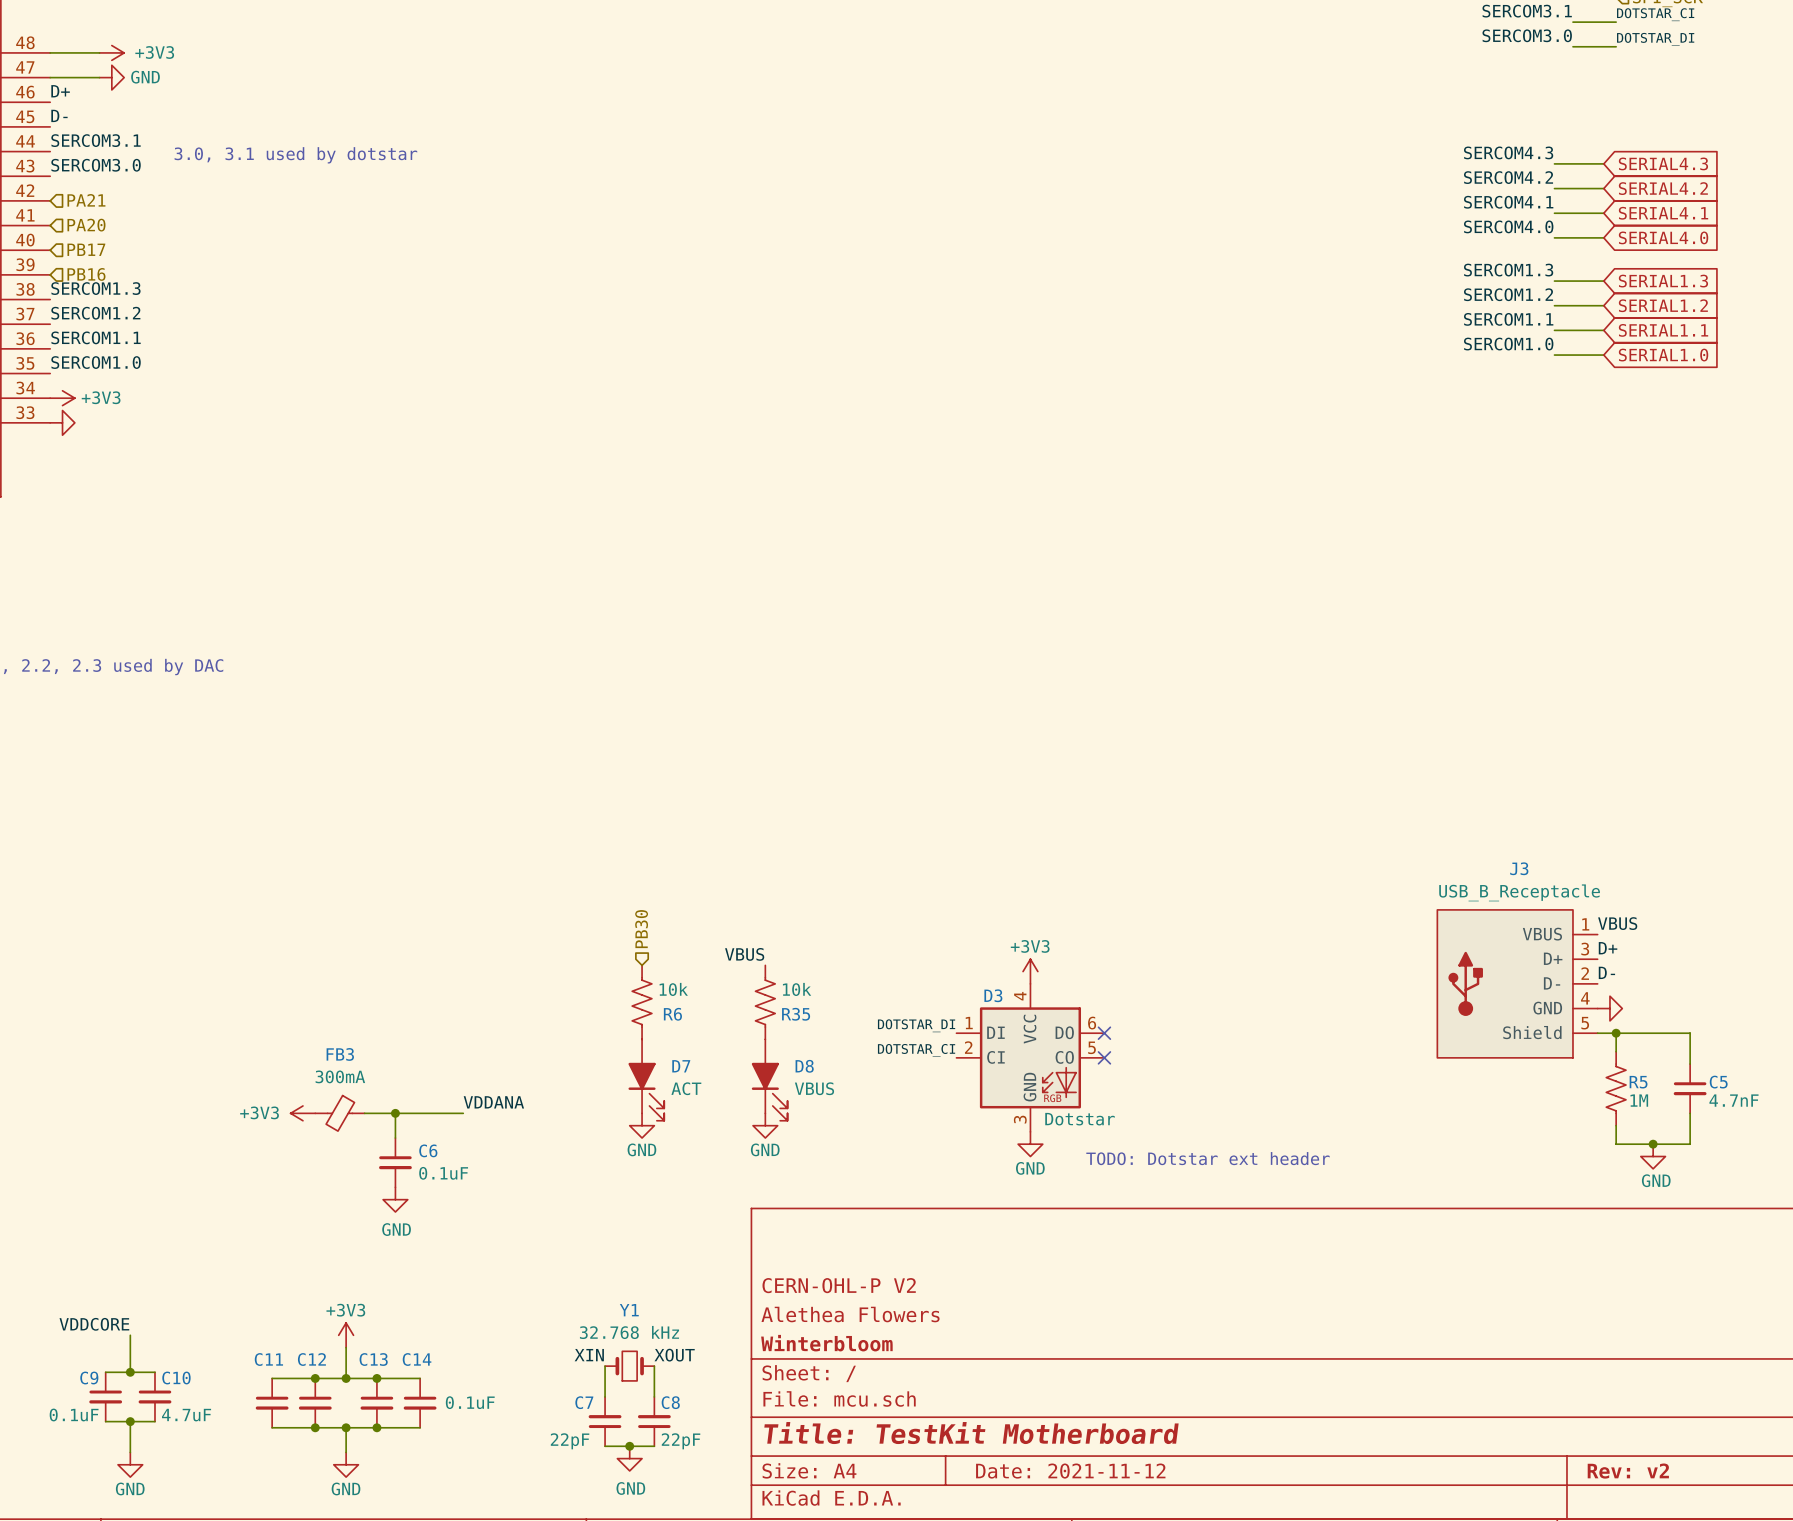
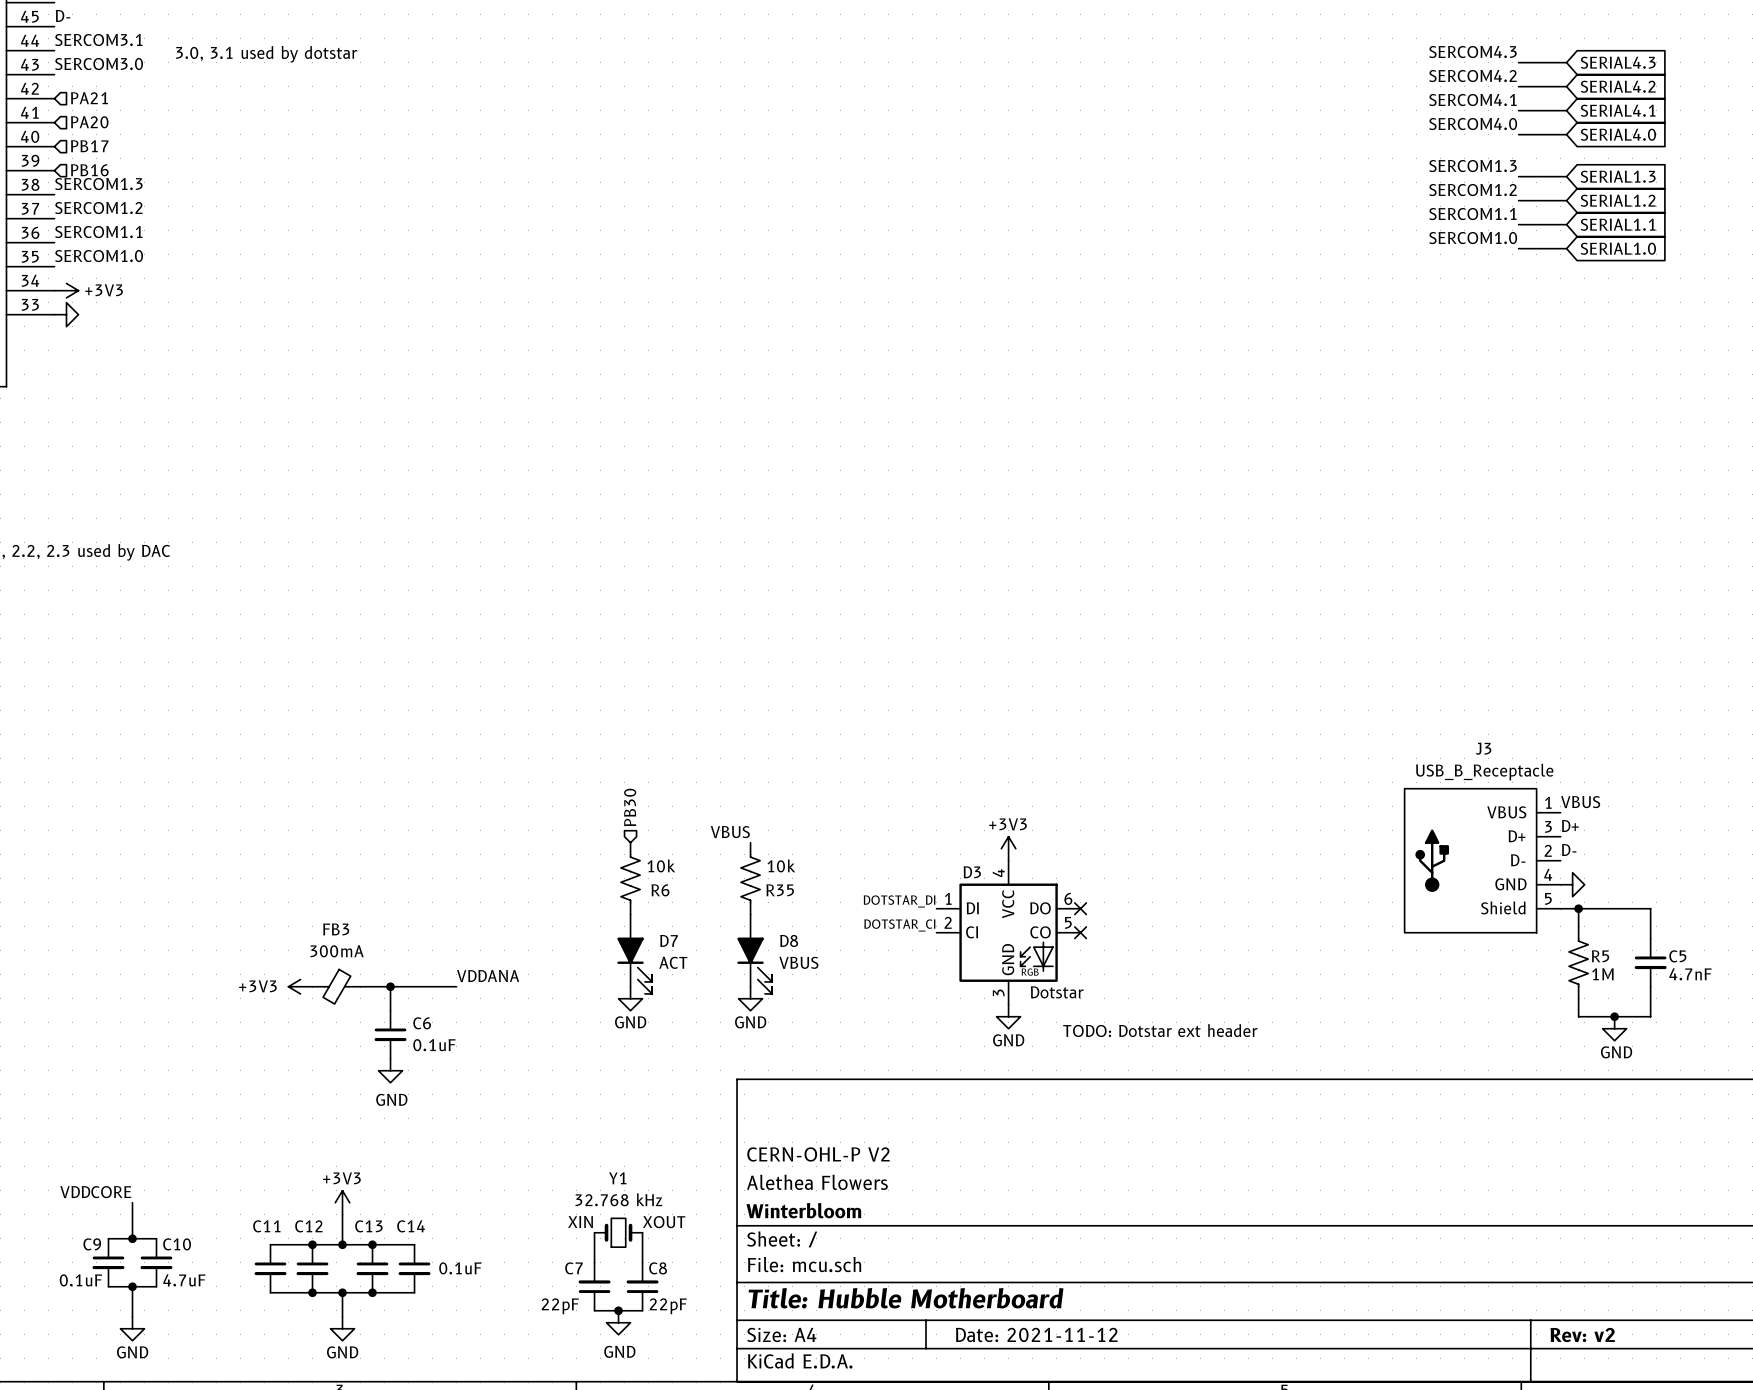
title block: Title: TestKit Motherboard (971, 1433) -> Title: Hubble Motherboard (906, 1298)

